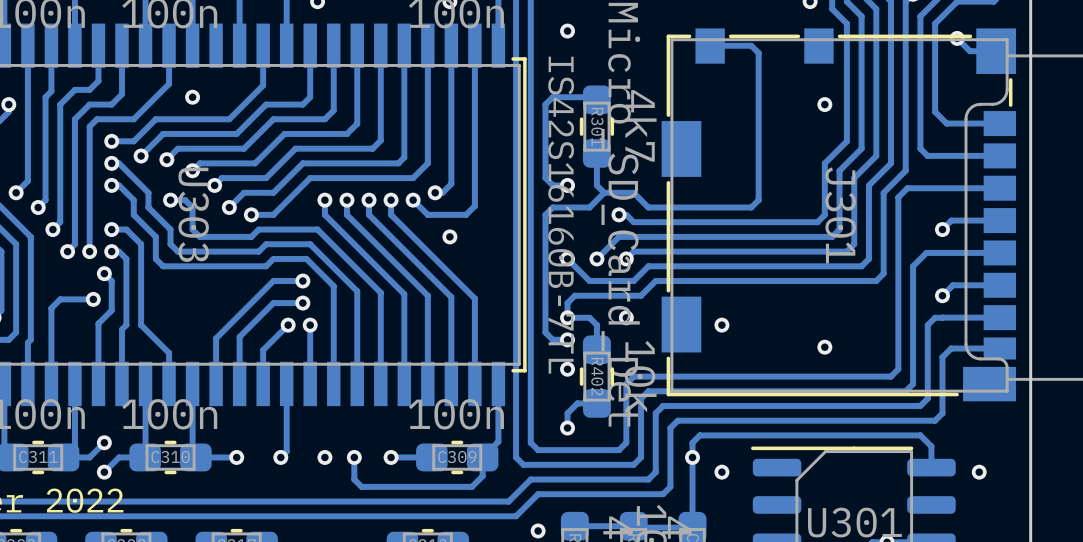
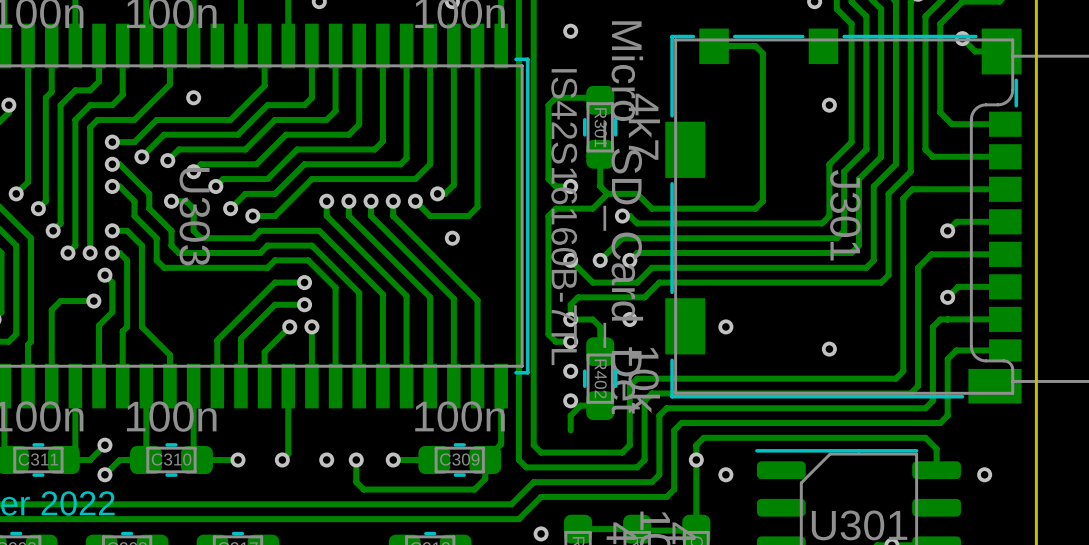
via position: (567, 428) -> (570, 400)

